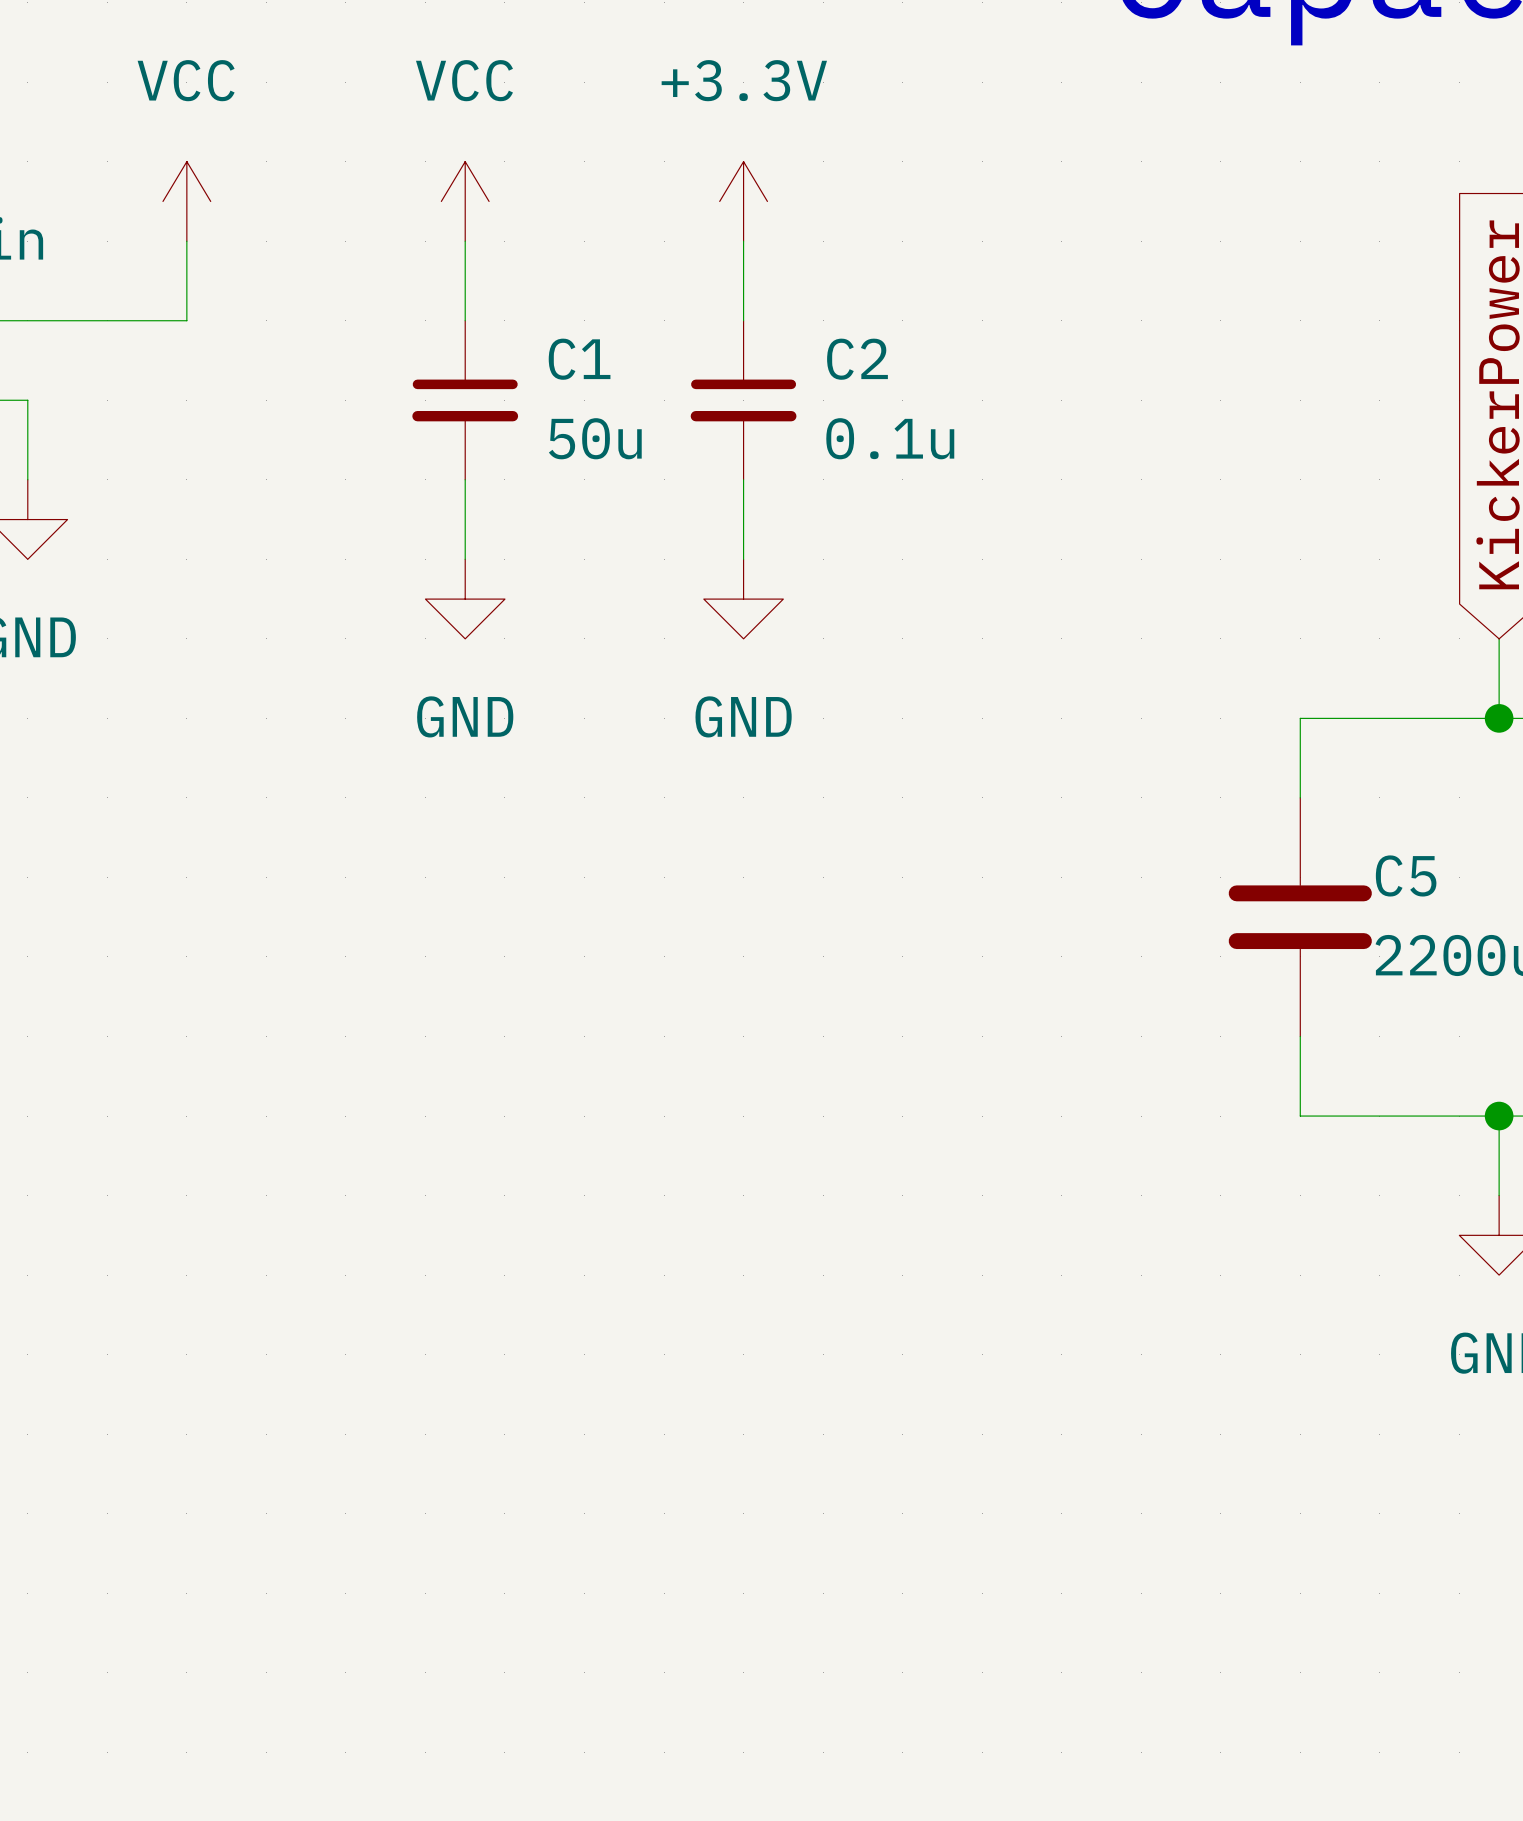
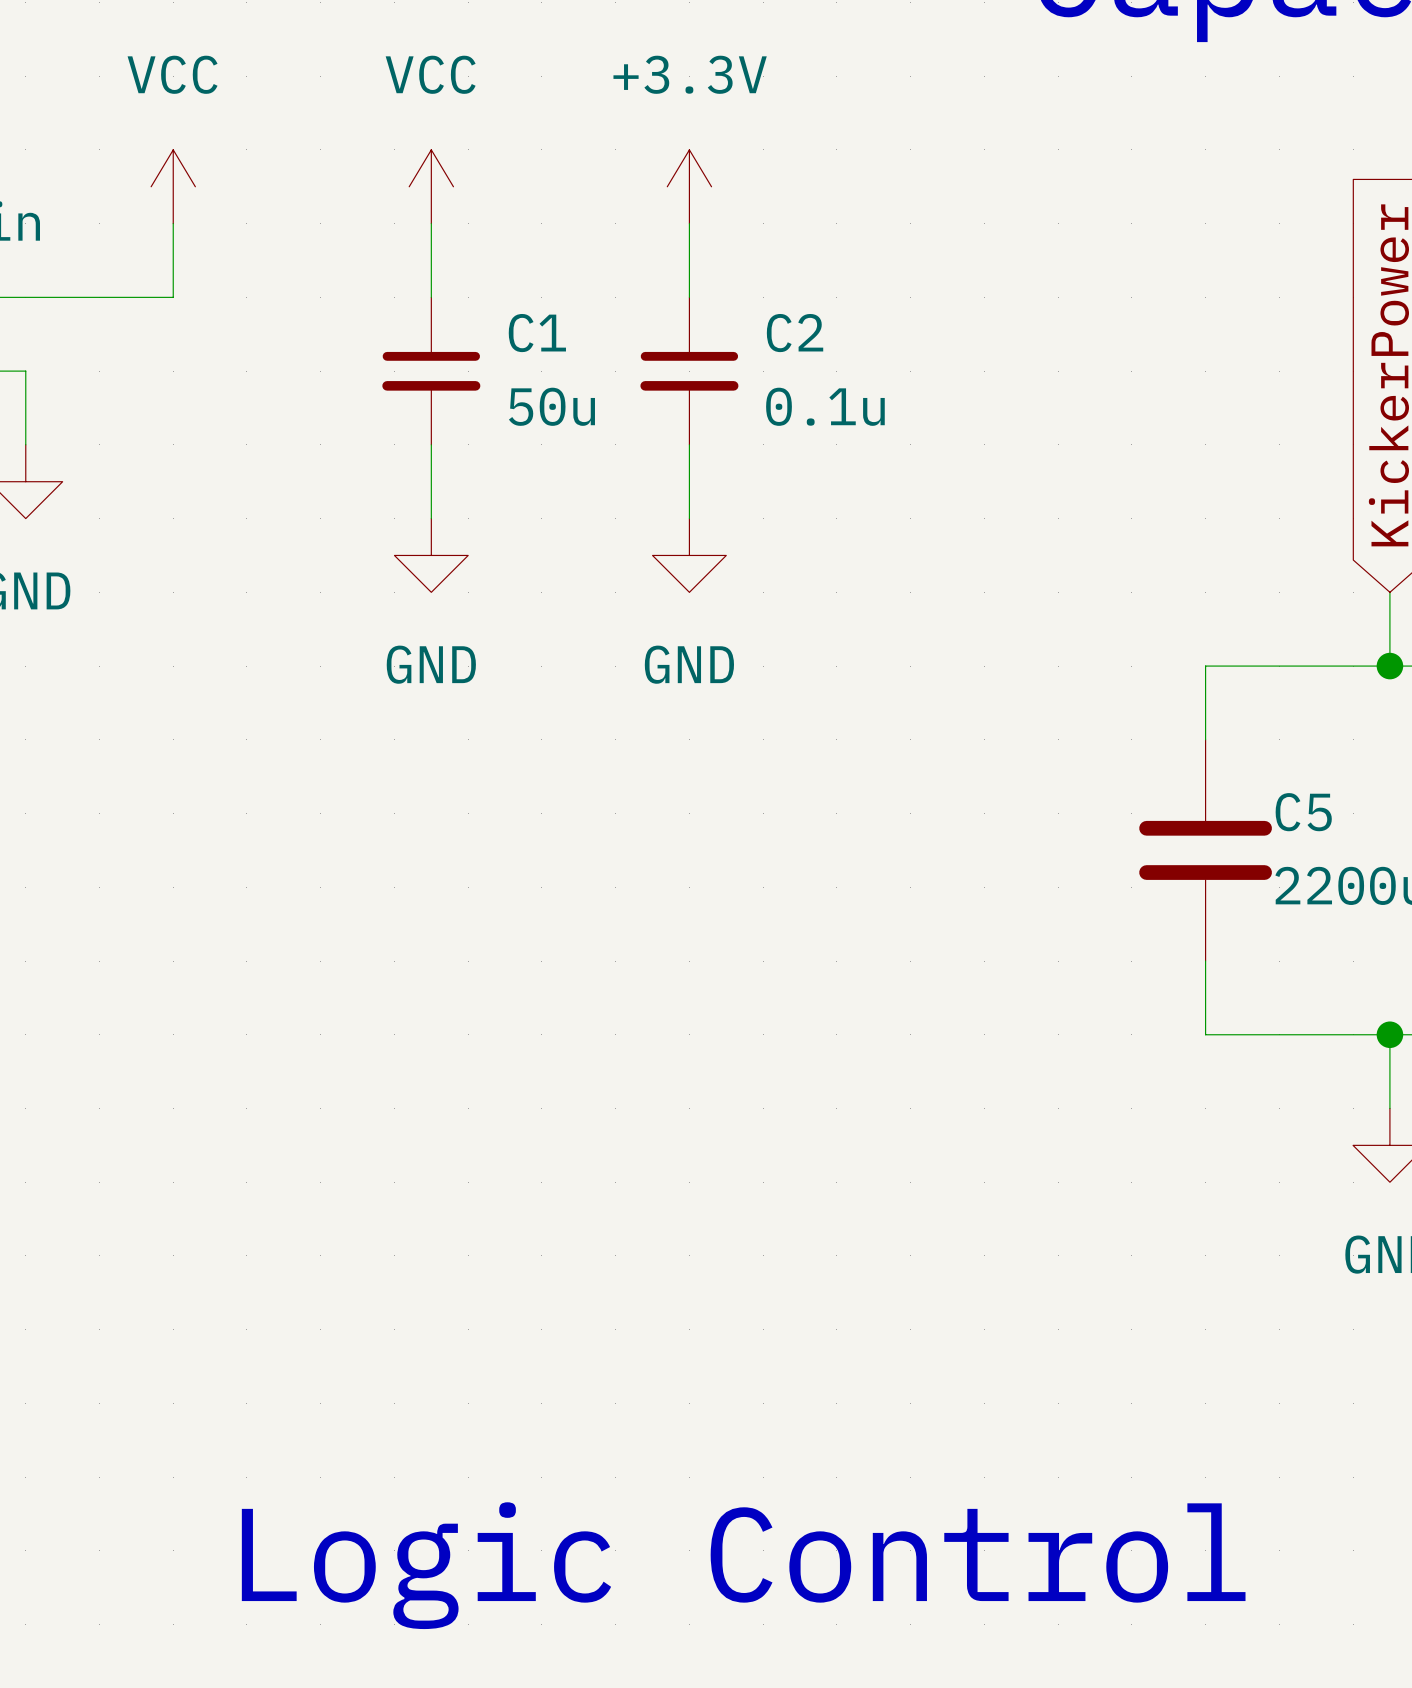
text: none -> Logic Control (743, 1565)

